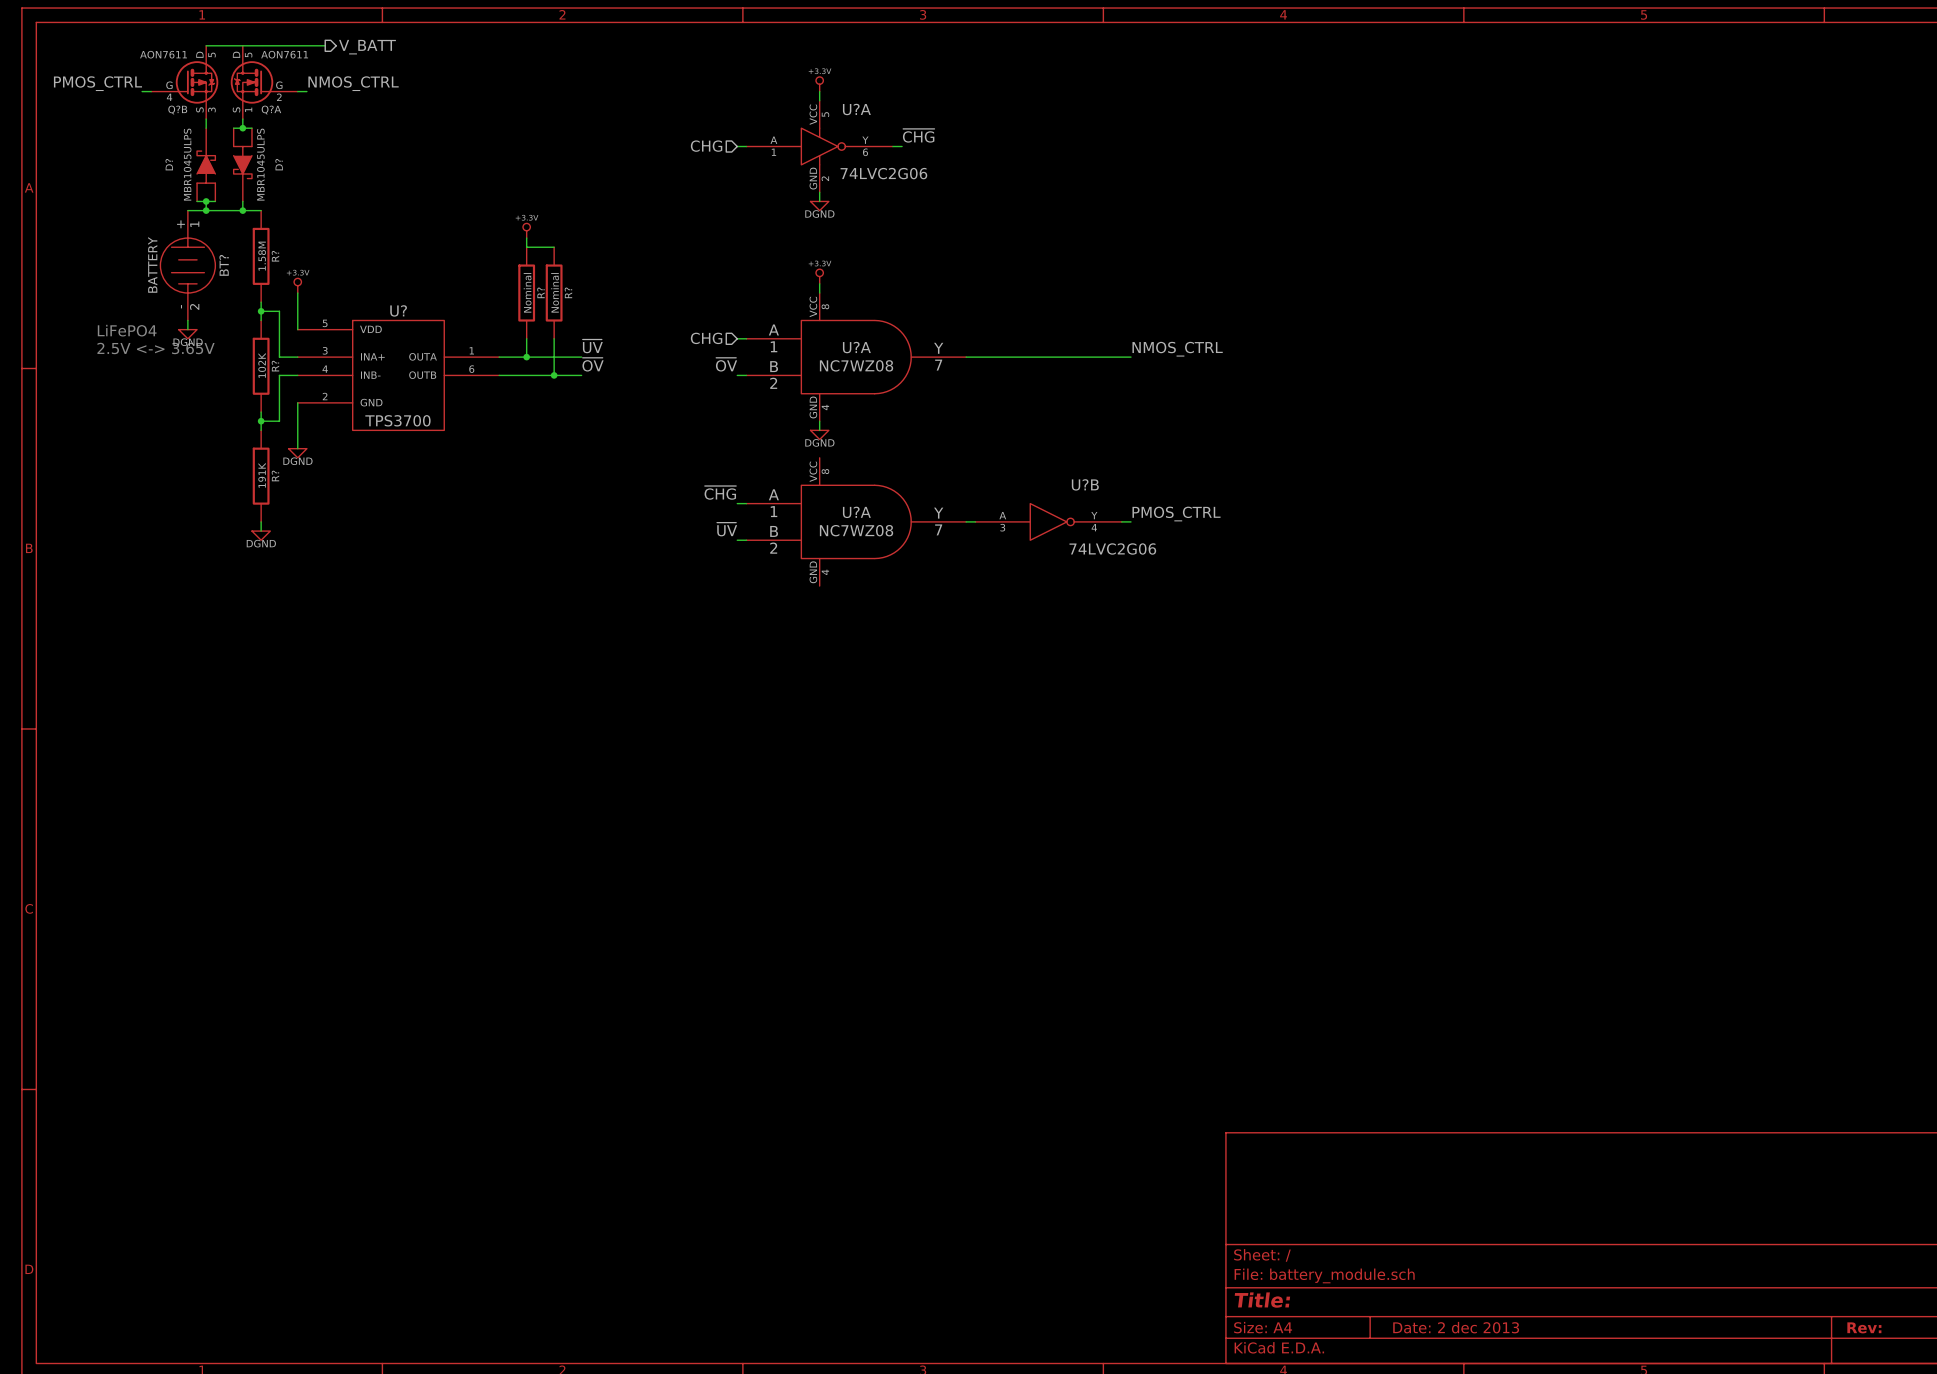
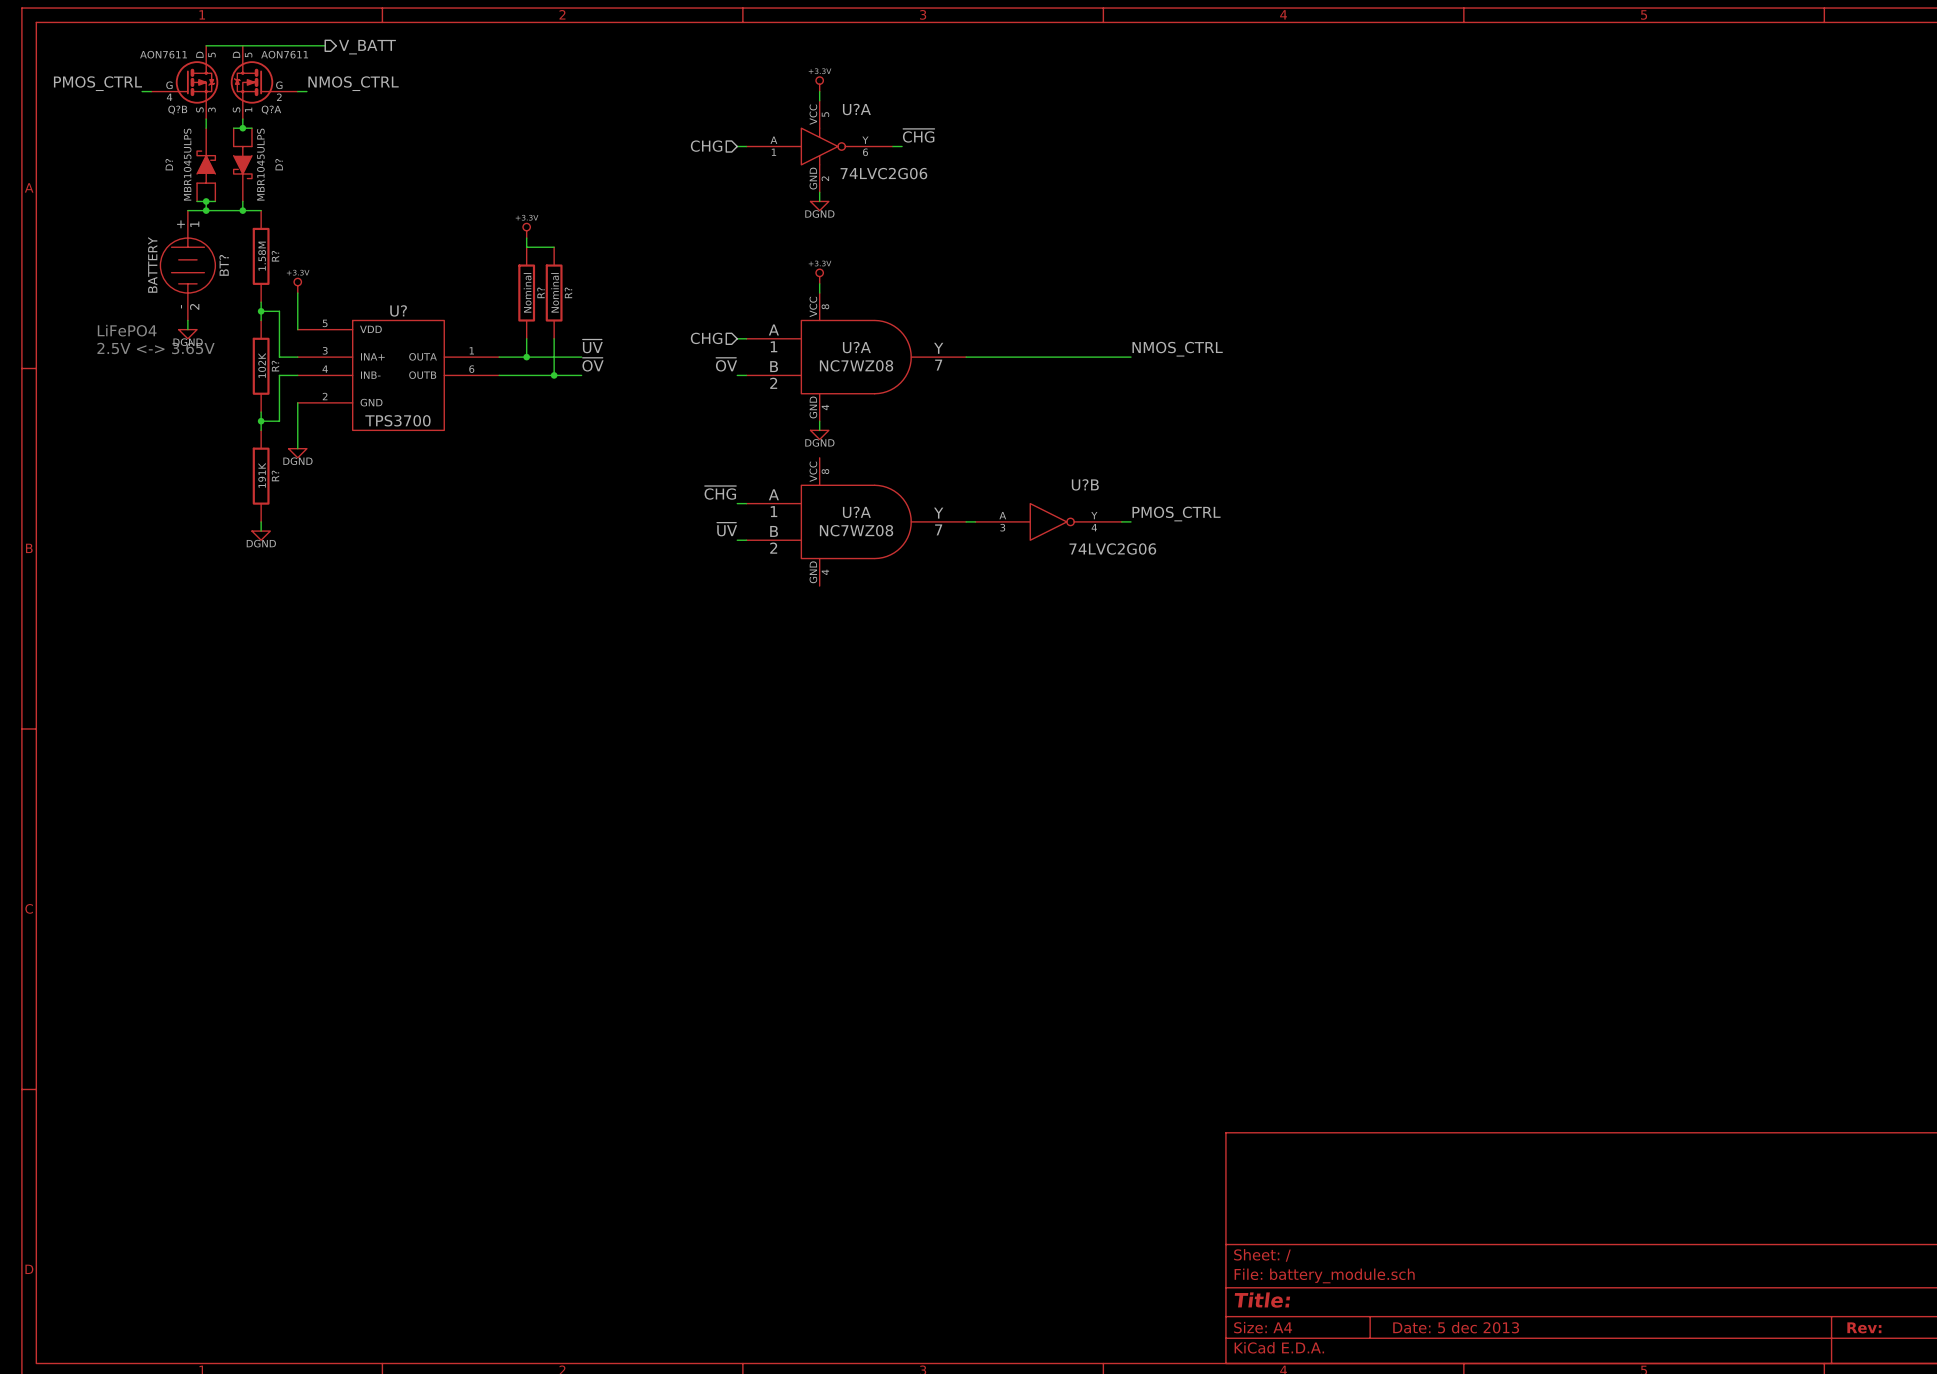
title block: Date: 2 dec 2013 (1456, 1327) -> Date: 5 dec 2013 (1456, 1327)

